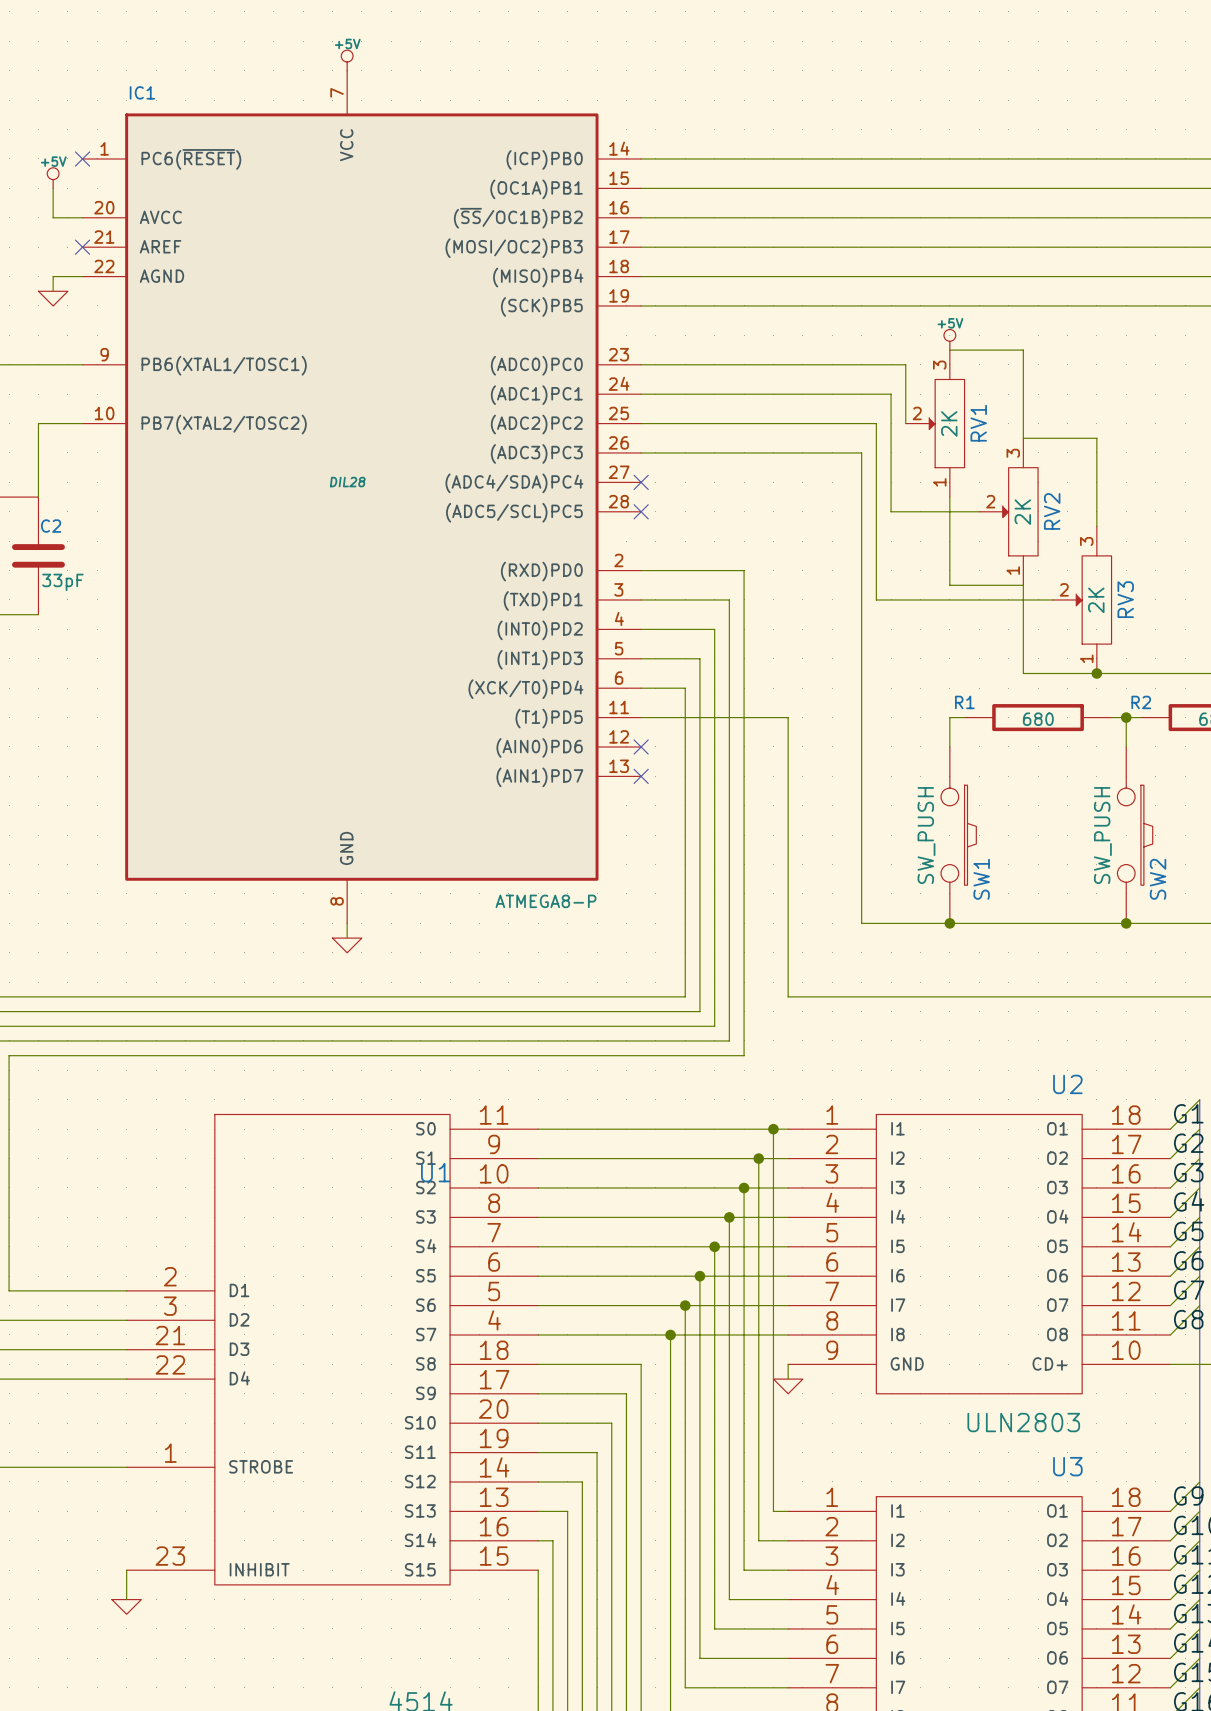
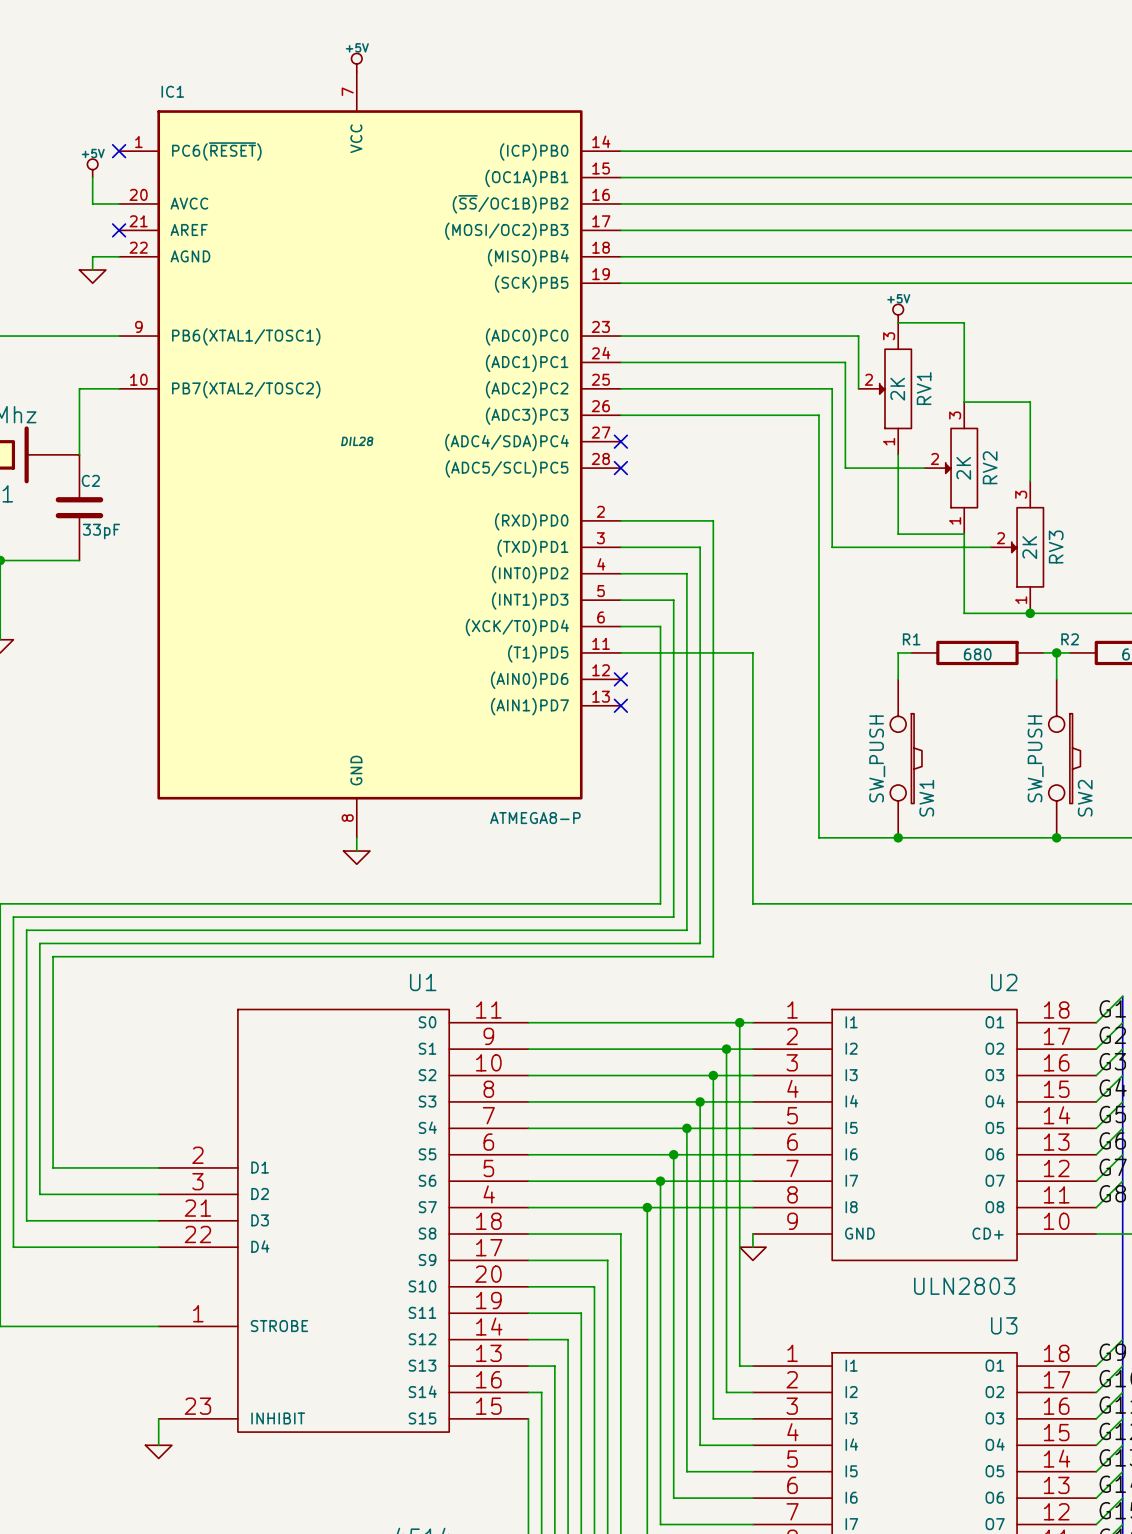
U1 name position: U1 (435, 1172) -> U1 (423, 982)

